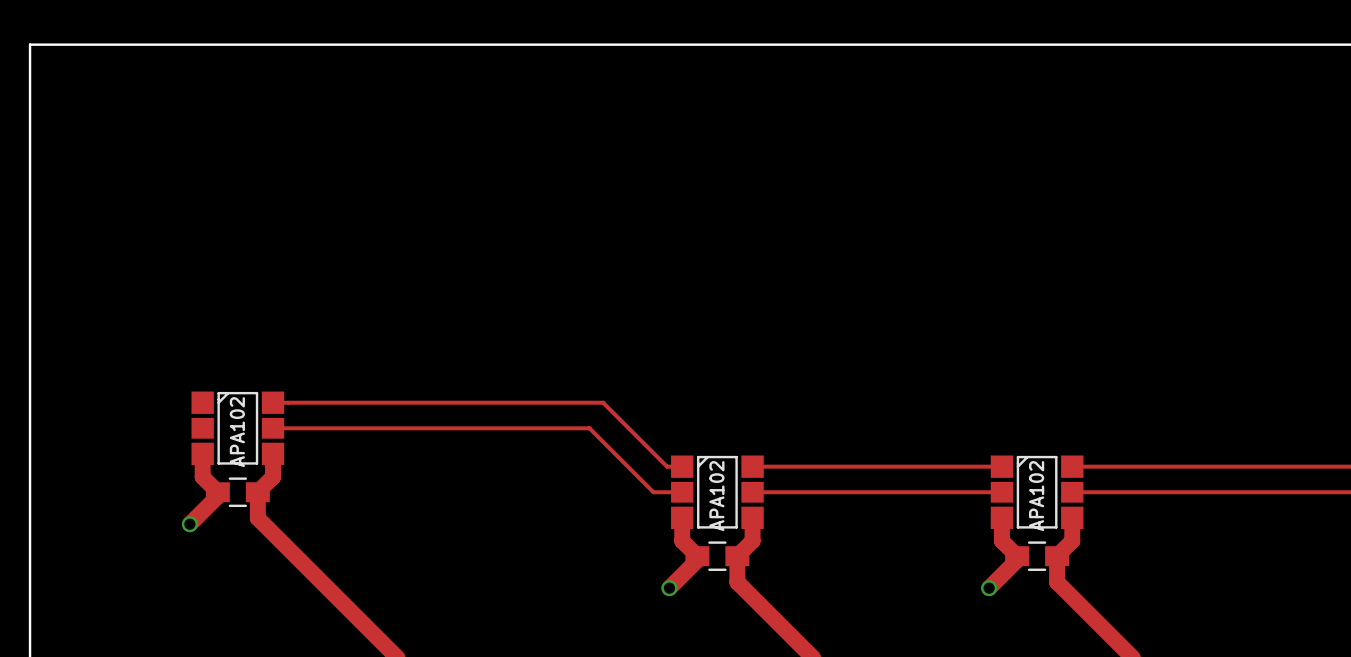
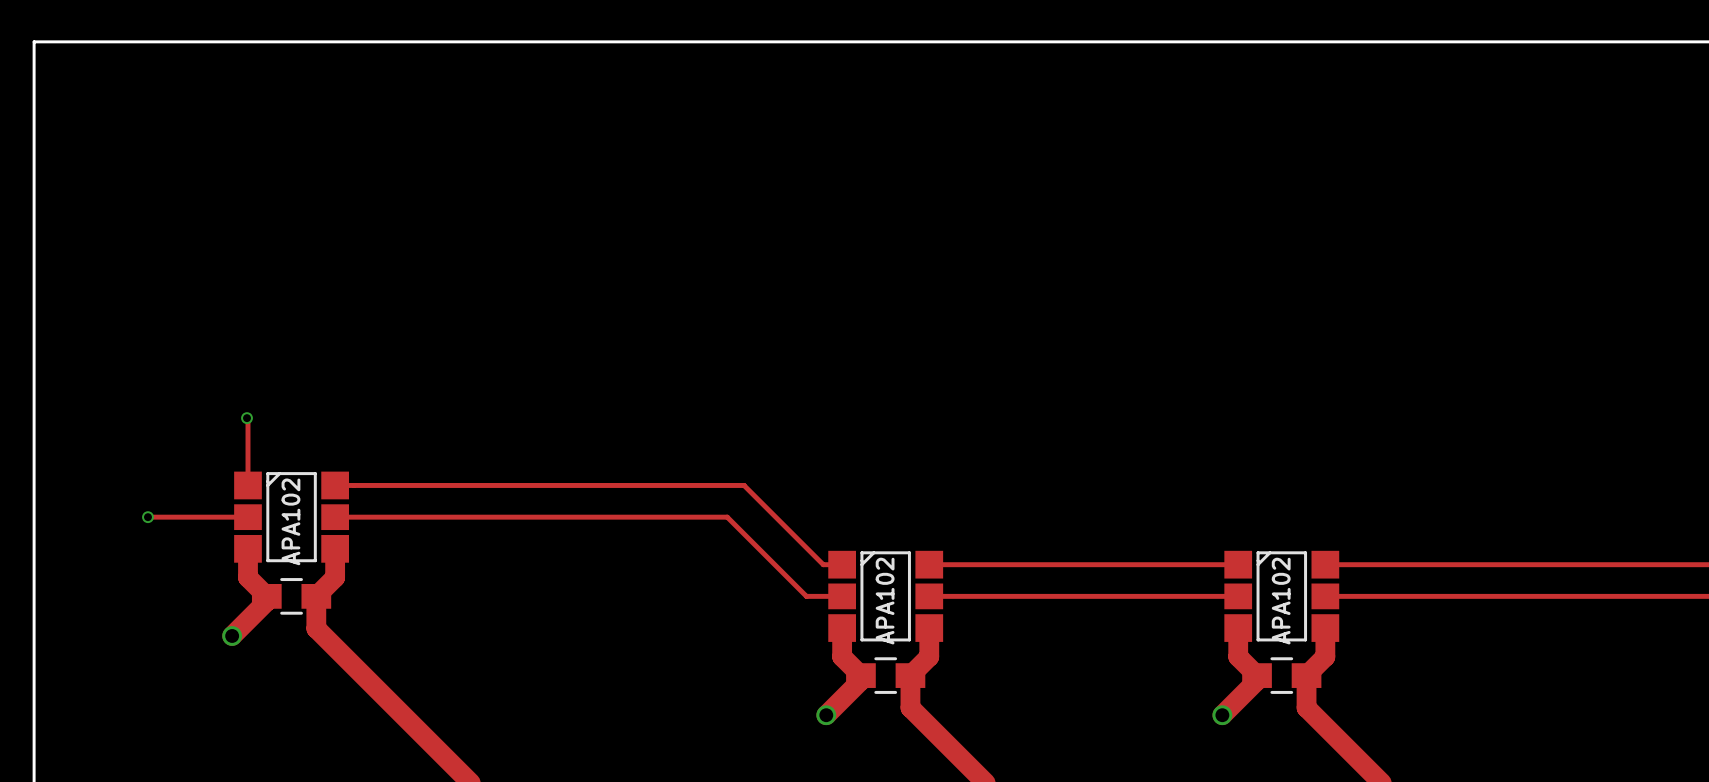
track: none -> (247, 418) (247, 485)
via: none -> (247, 418)
track: none -> (147, 517) (247, 517)
via: none -> (147, 517)

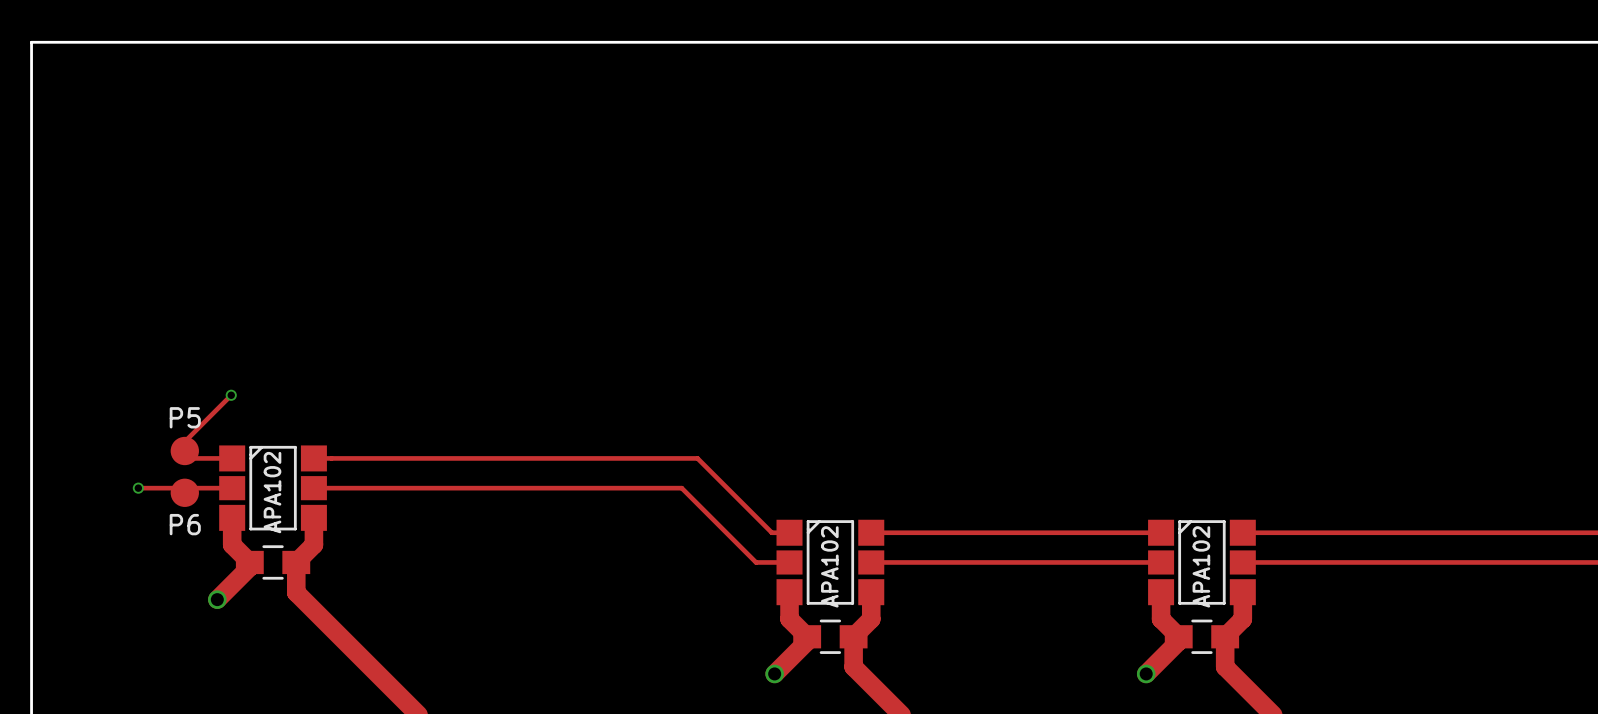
track: (247, 419) (247, 485) -> (231, 395) (184, 441) (184, 451) (192, 458) (232, 458)
P5: none -> (184, 451)
P6: none -> (184, 492)

